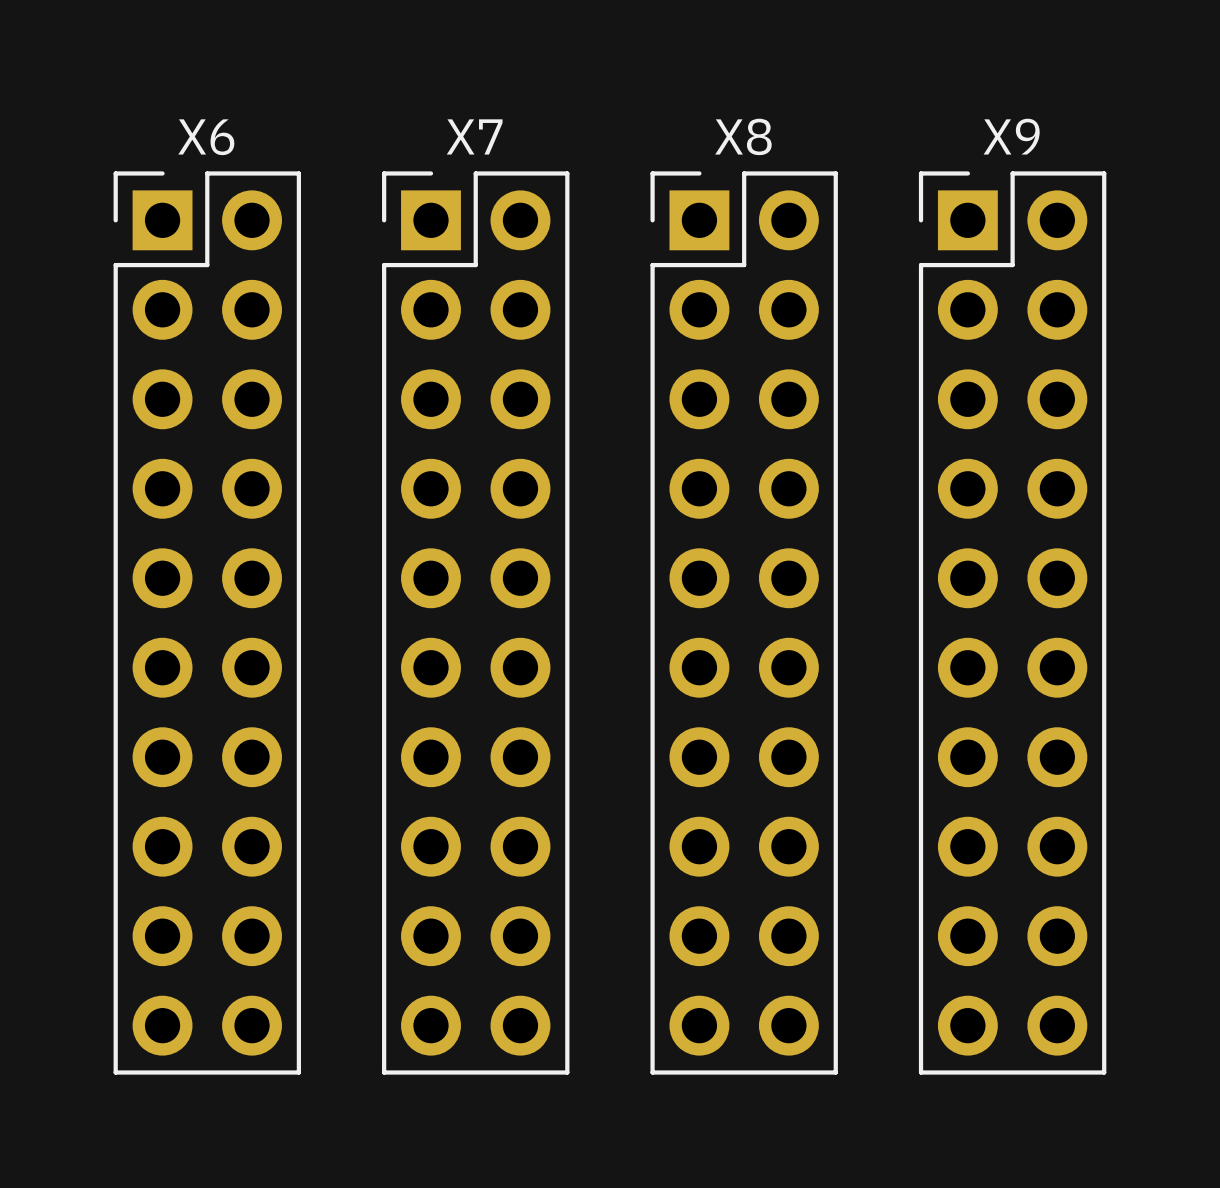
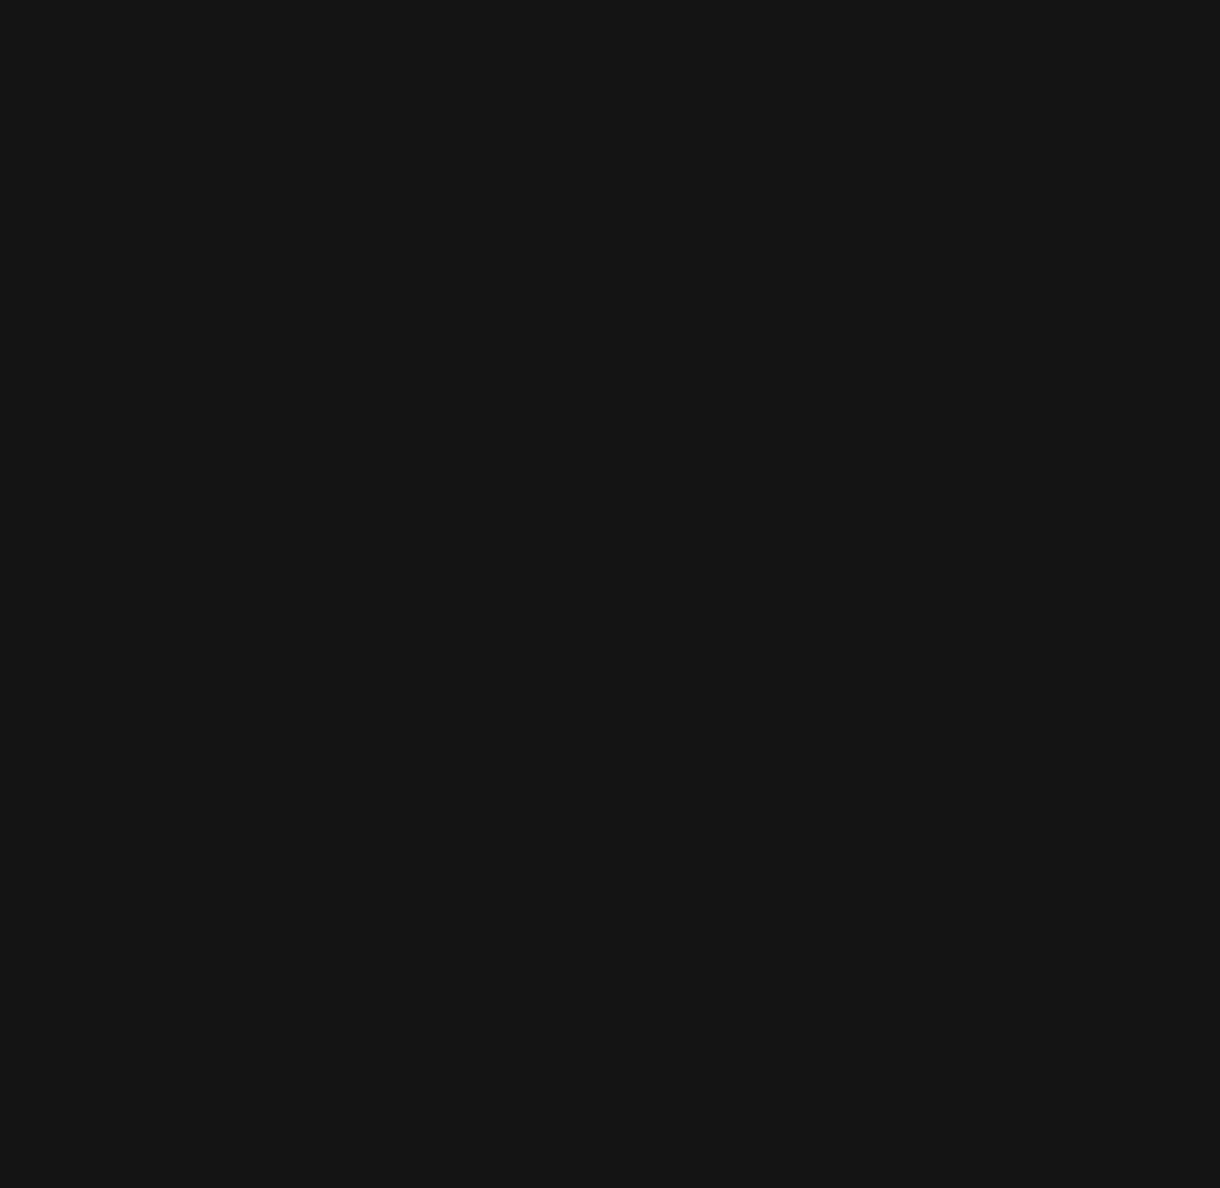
X6: (207, 623) -> none
X7: (475, 623) -> none
X8: (744, 623) -> none
X9: (1012, 623) -> none

